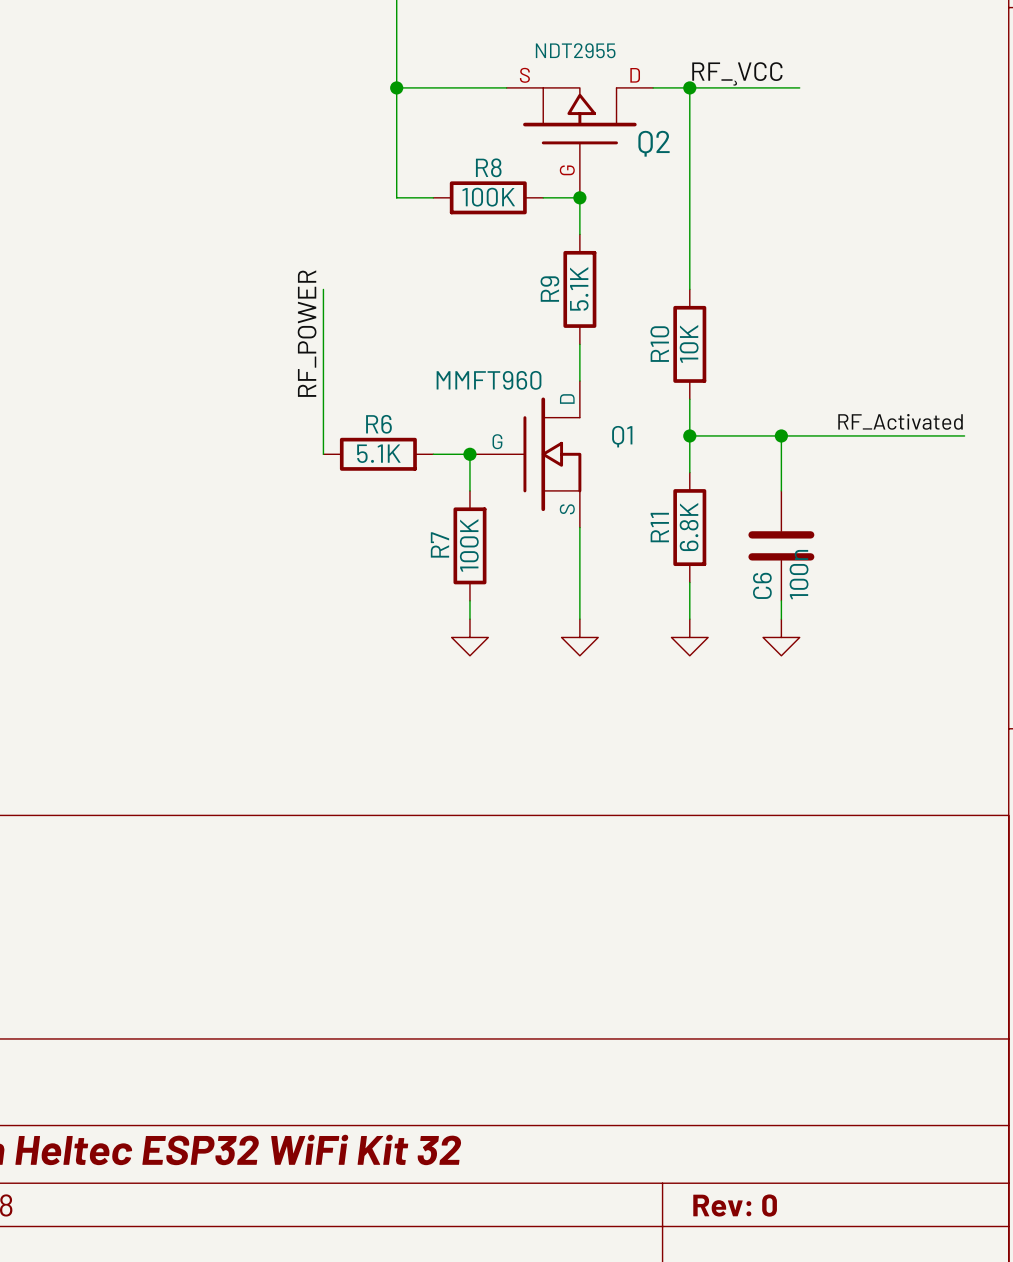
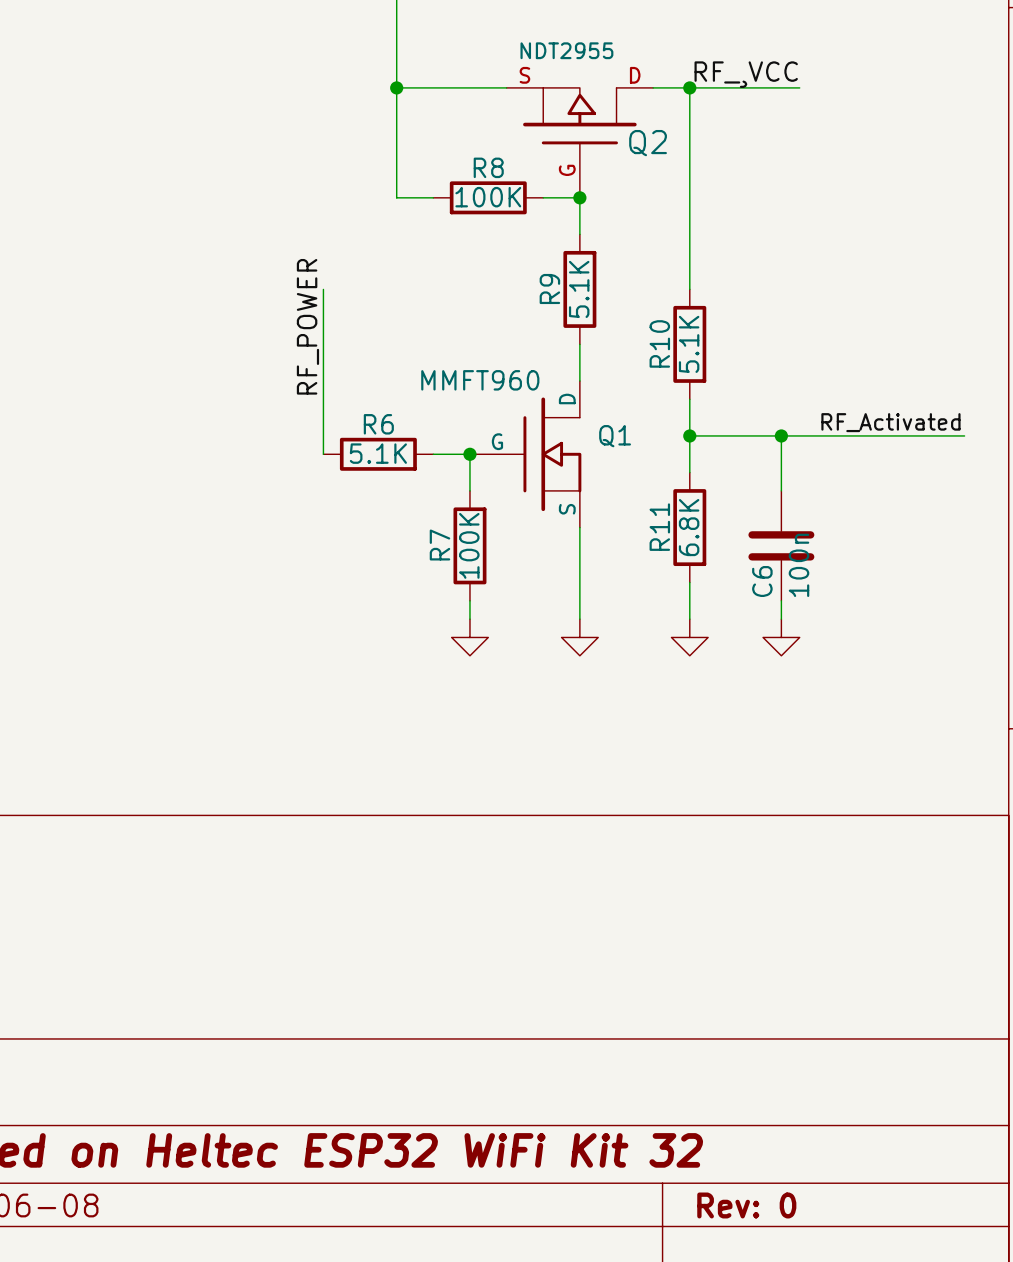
R10 value: 10K (689, 343) -> 5.1K (689, 344)

